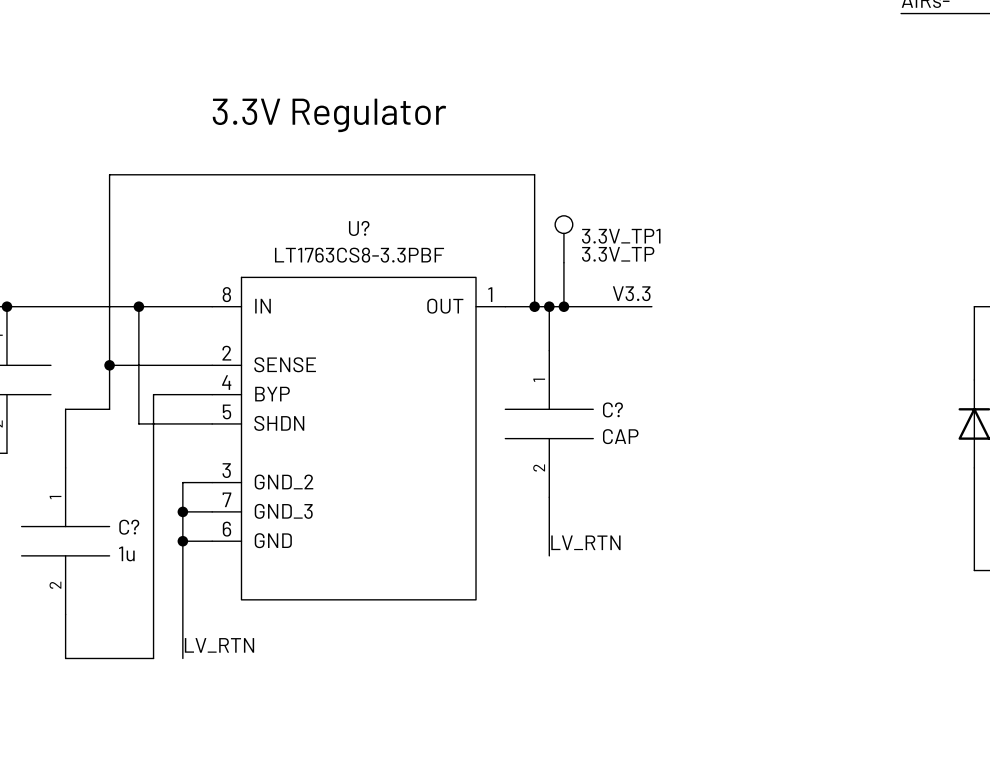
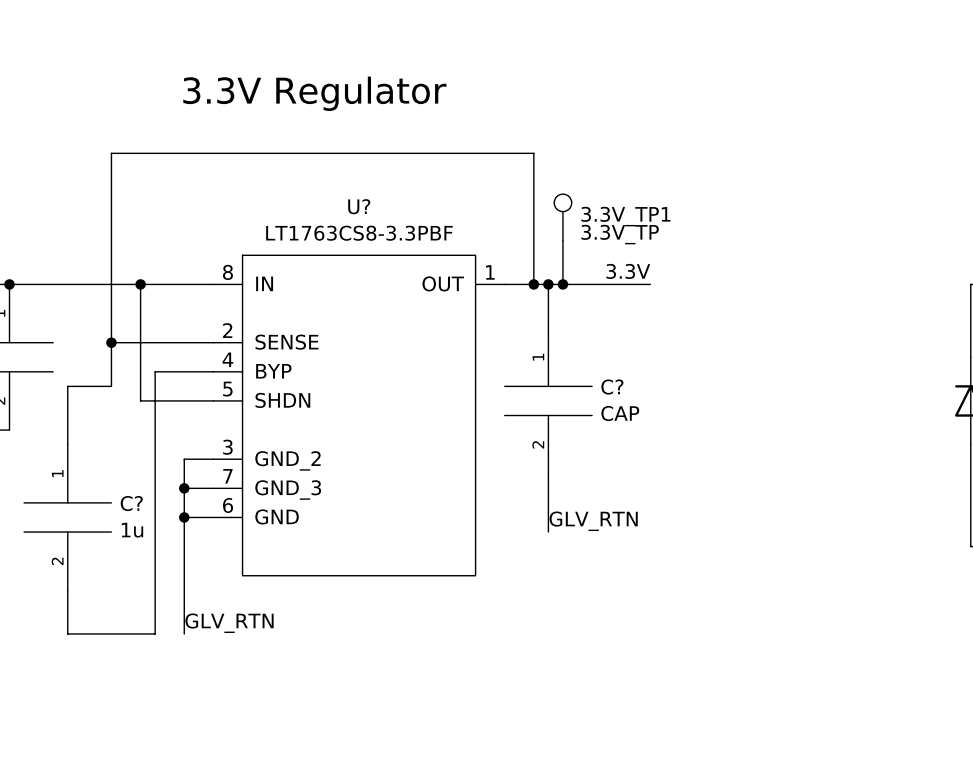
label: V3.3 (631, 293) -> 3.3V (628, 271)
label: LV_RTN (585, 542) -> GLV_RTN (593, 521)
label: LV_RTN (219, 645) -> GLV_RTN (229, 623)

